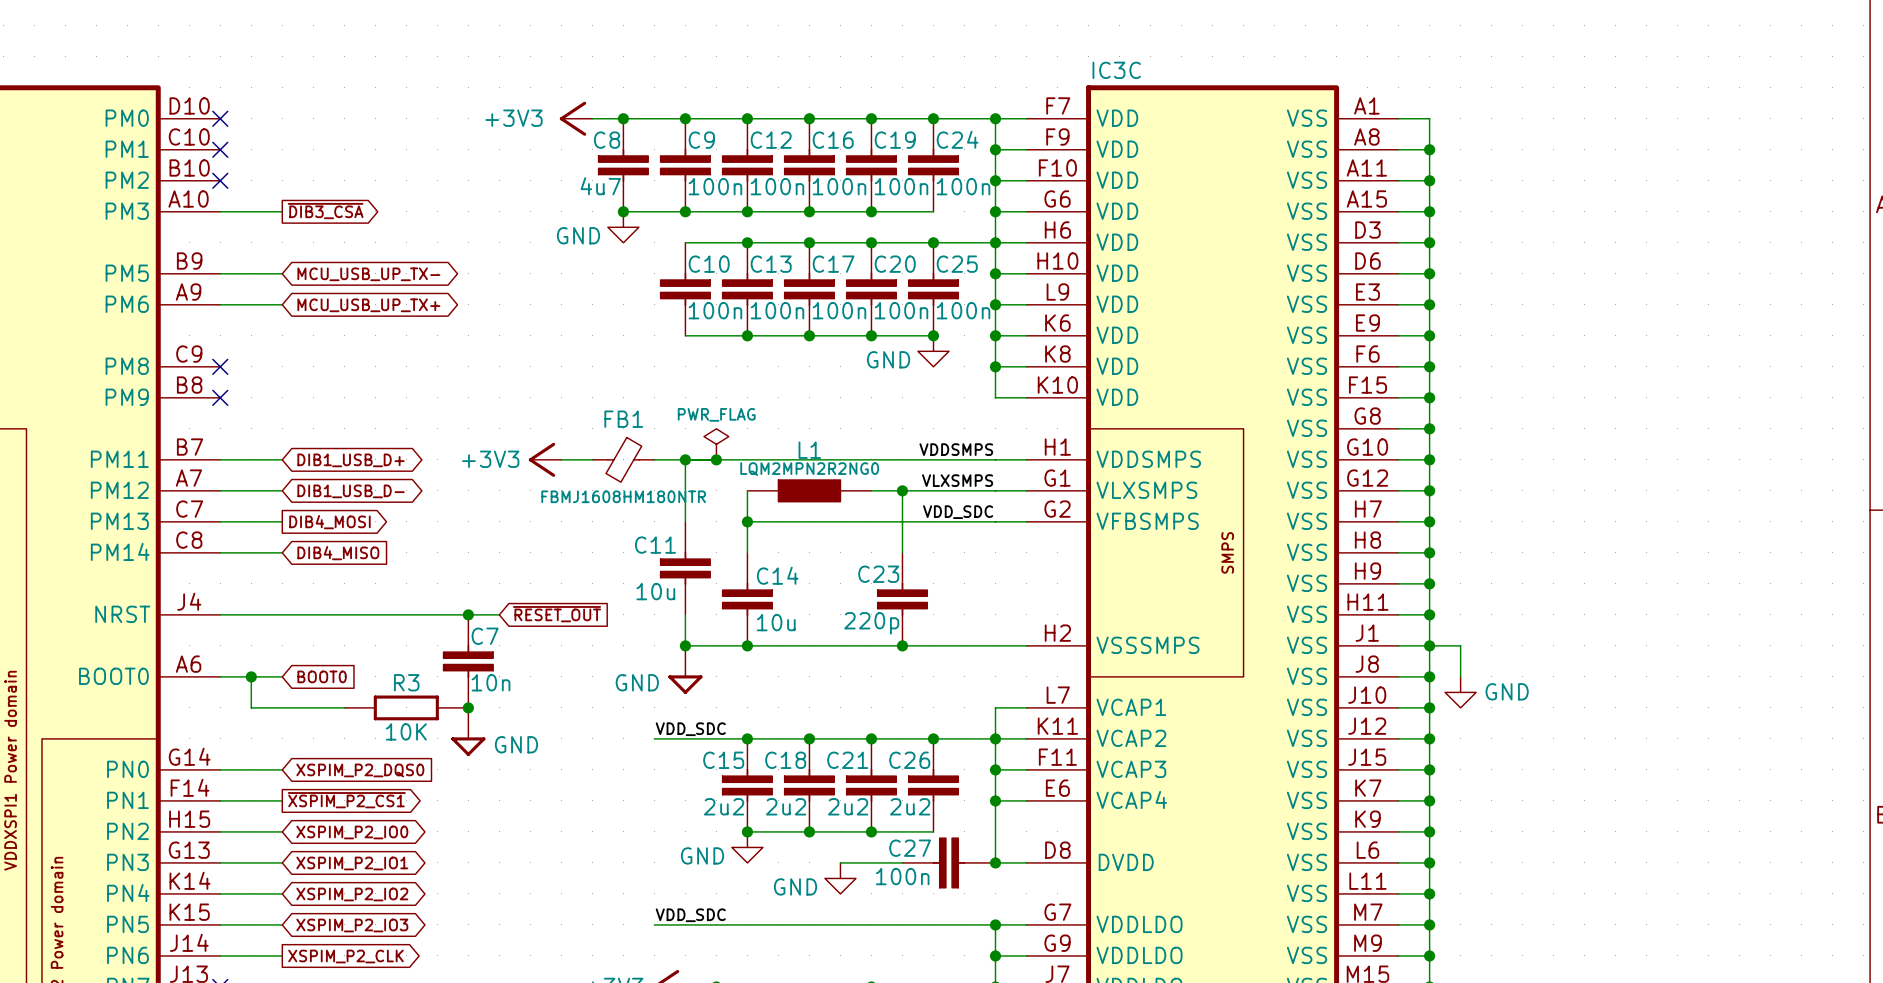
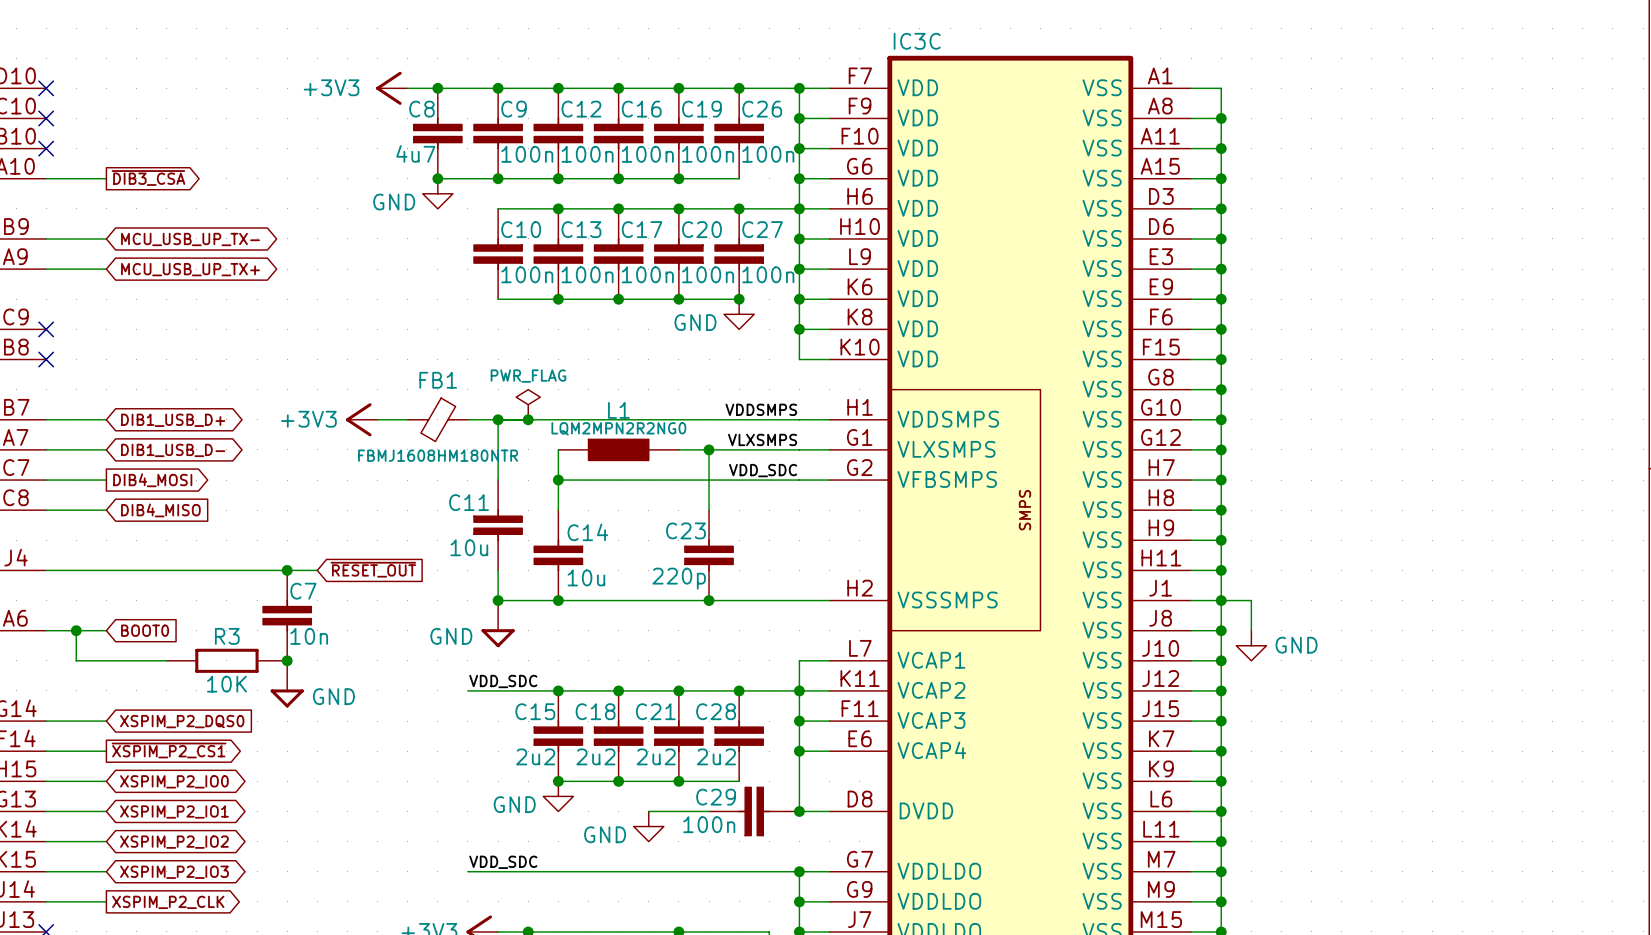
C24 name: C24 (957, 139) -> C26 (762, 109)
C25 name: C25 (957, 264) -> C27 (762, 229)
C26 name: C26 (909, 760) -> C28 (716, 711)
C27 name: C27 (910, 848) -> C29 (716, 797)

